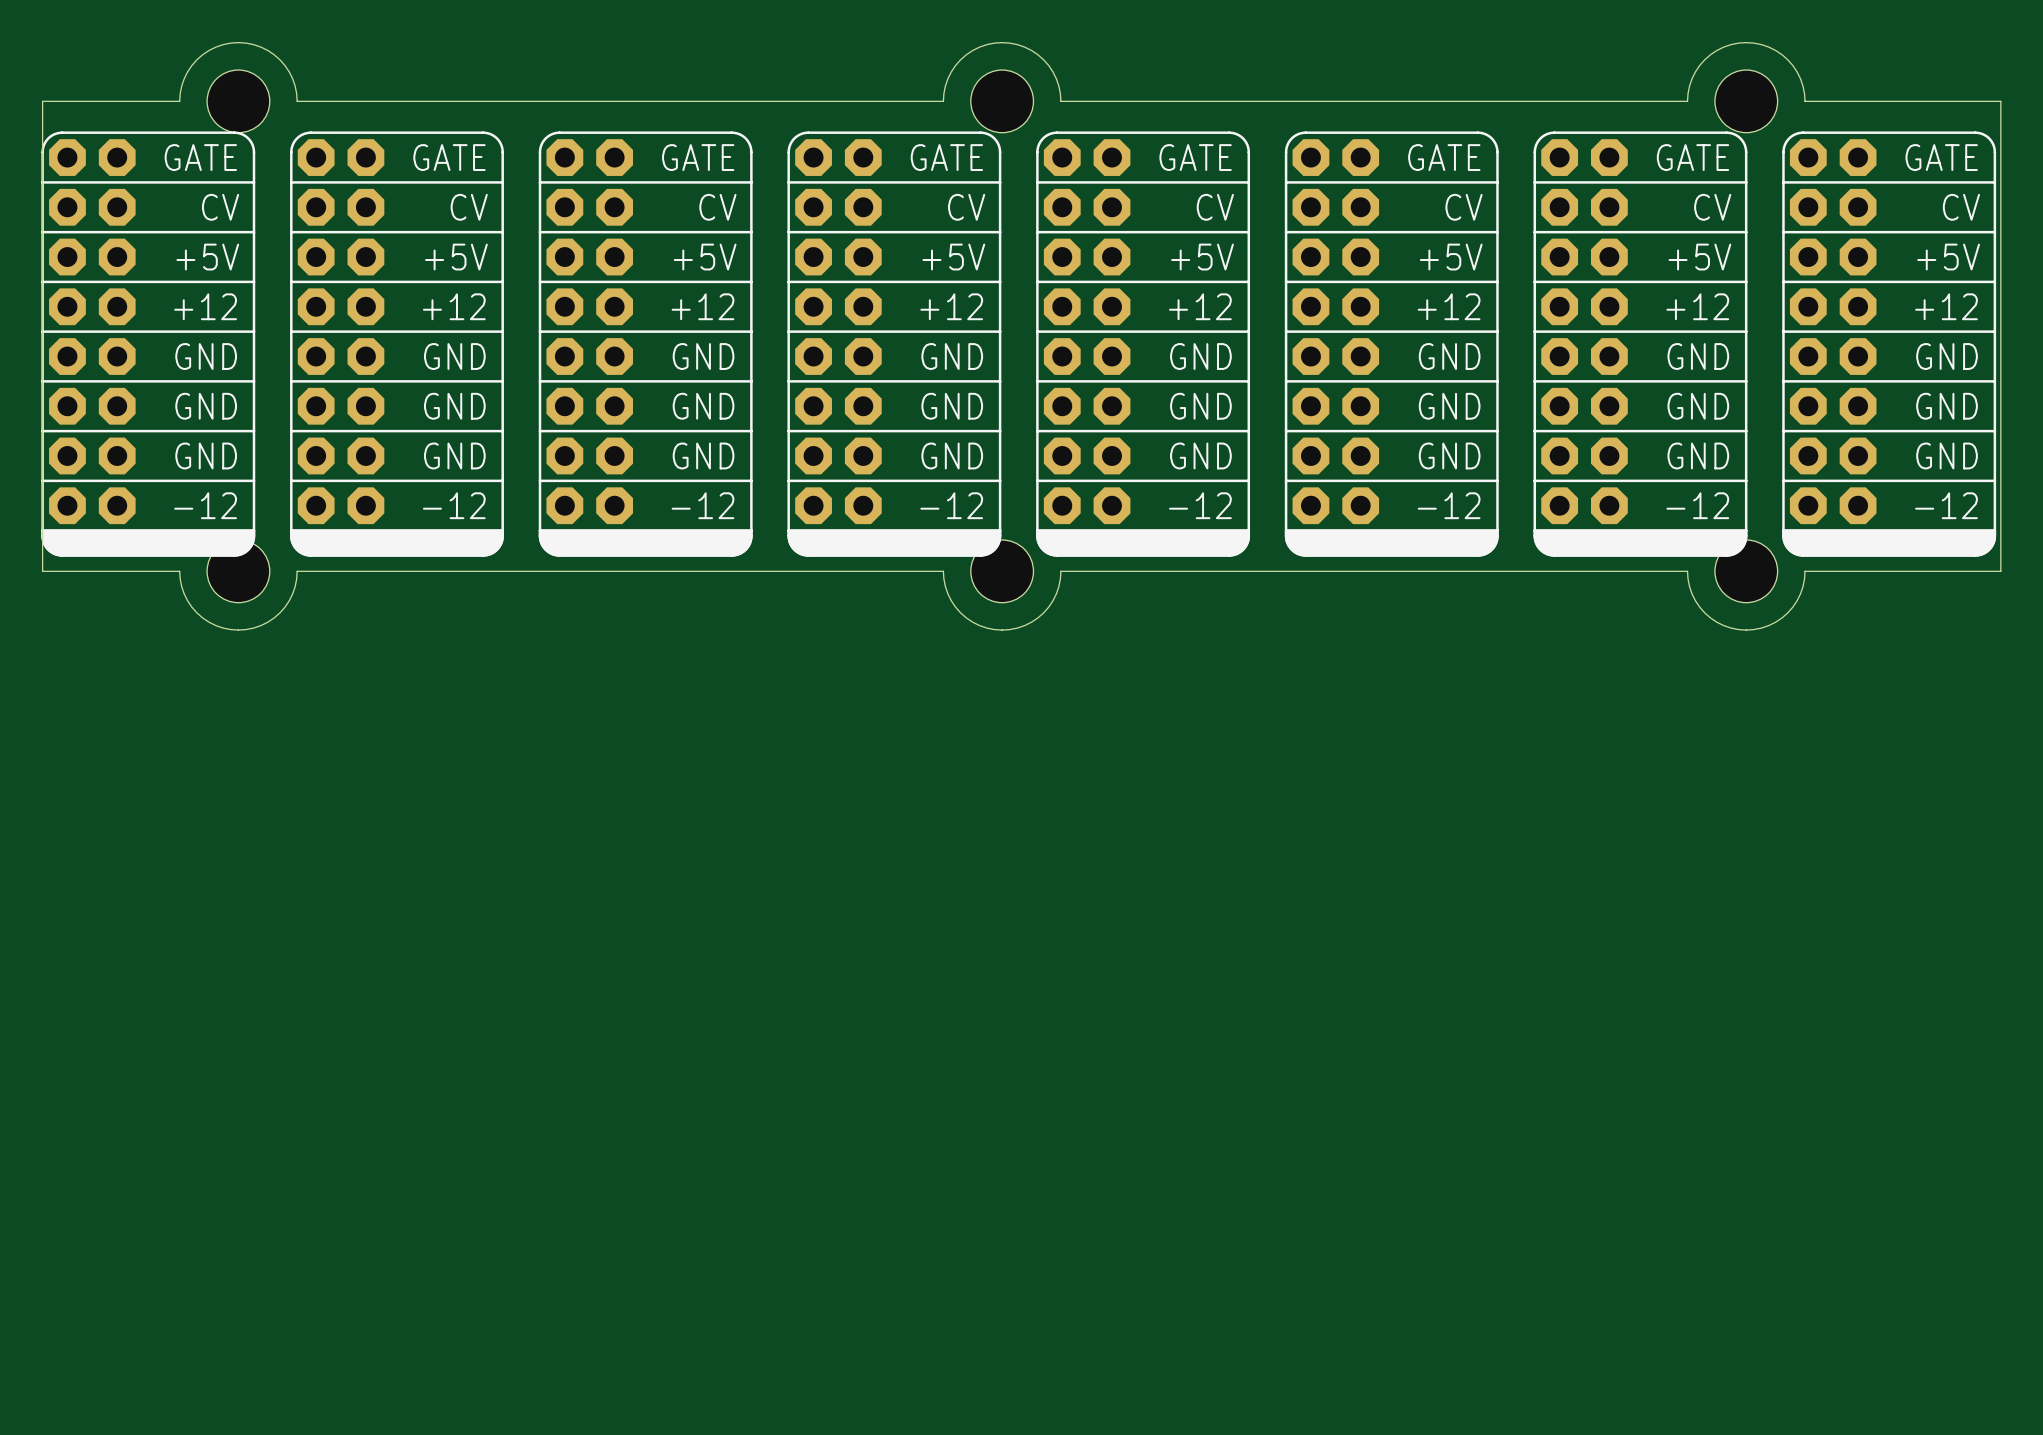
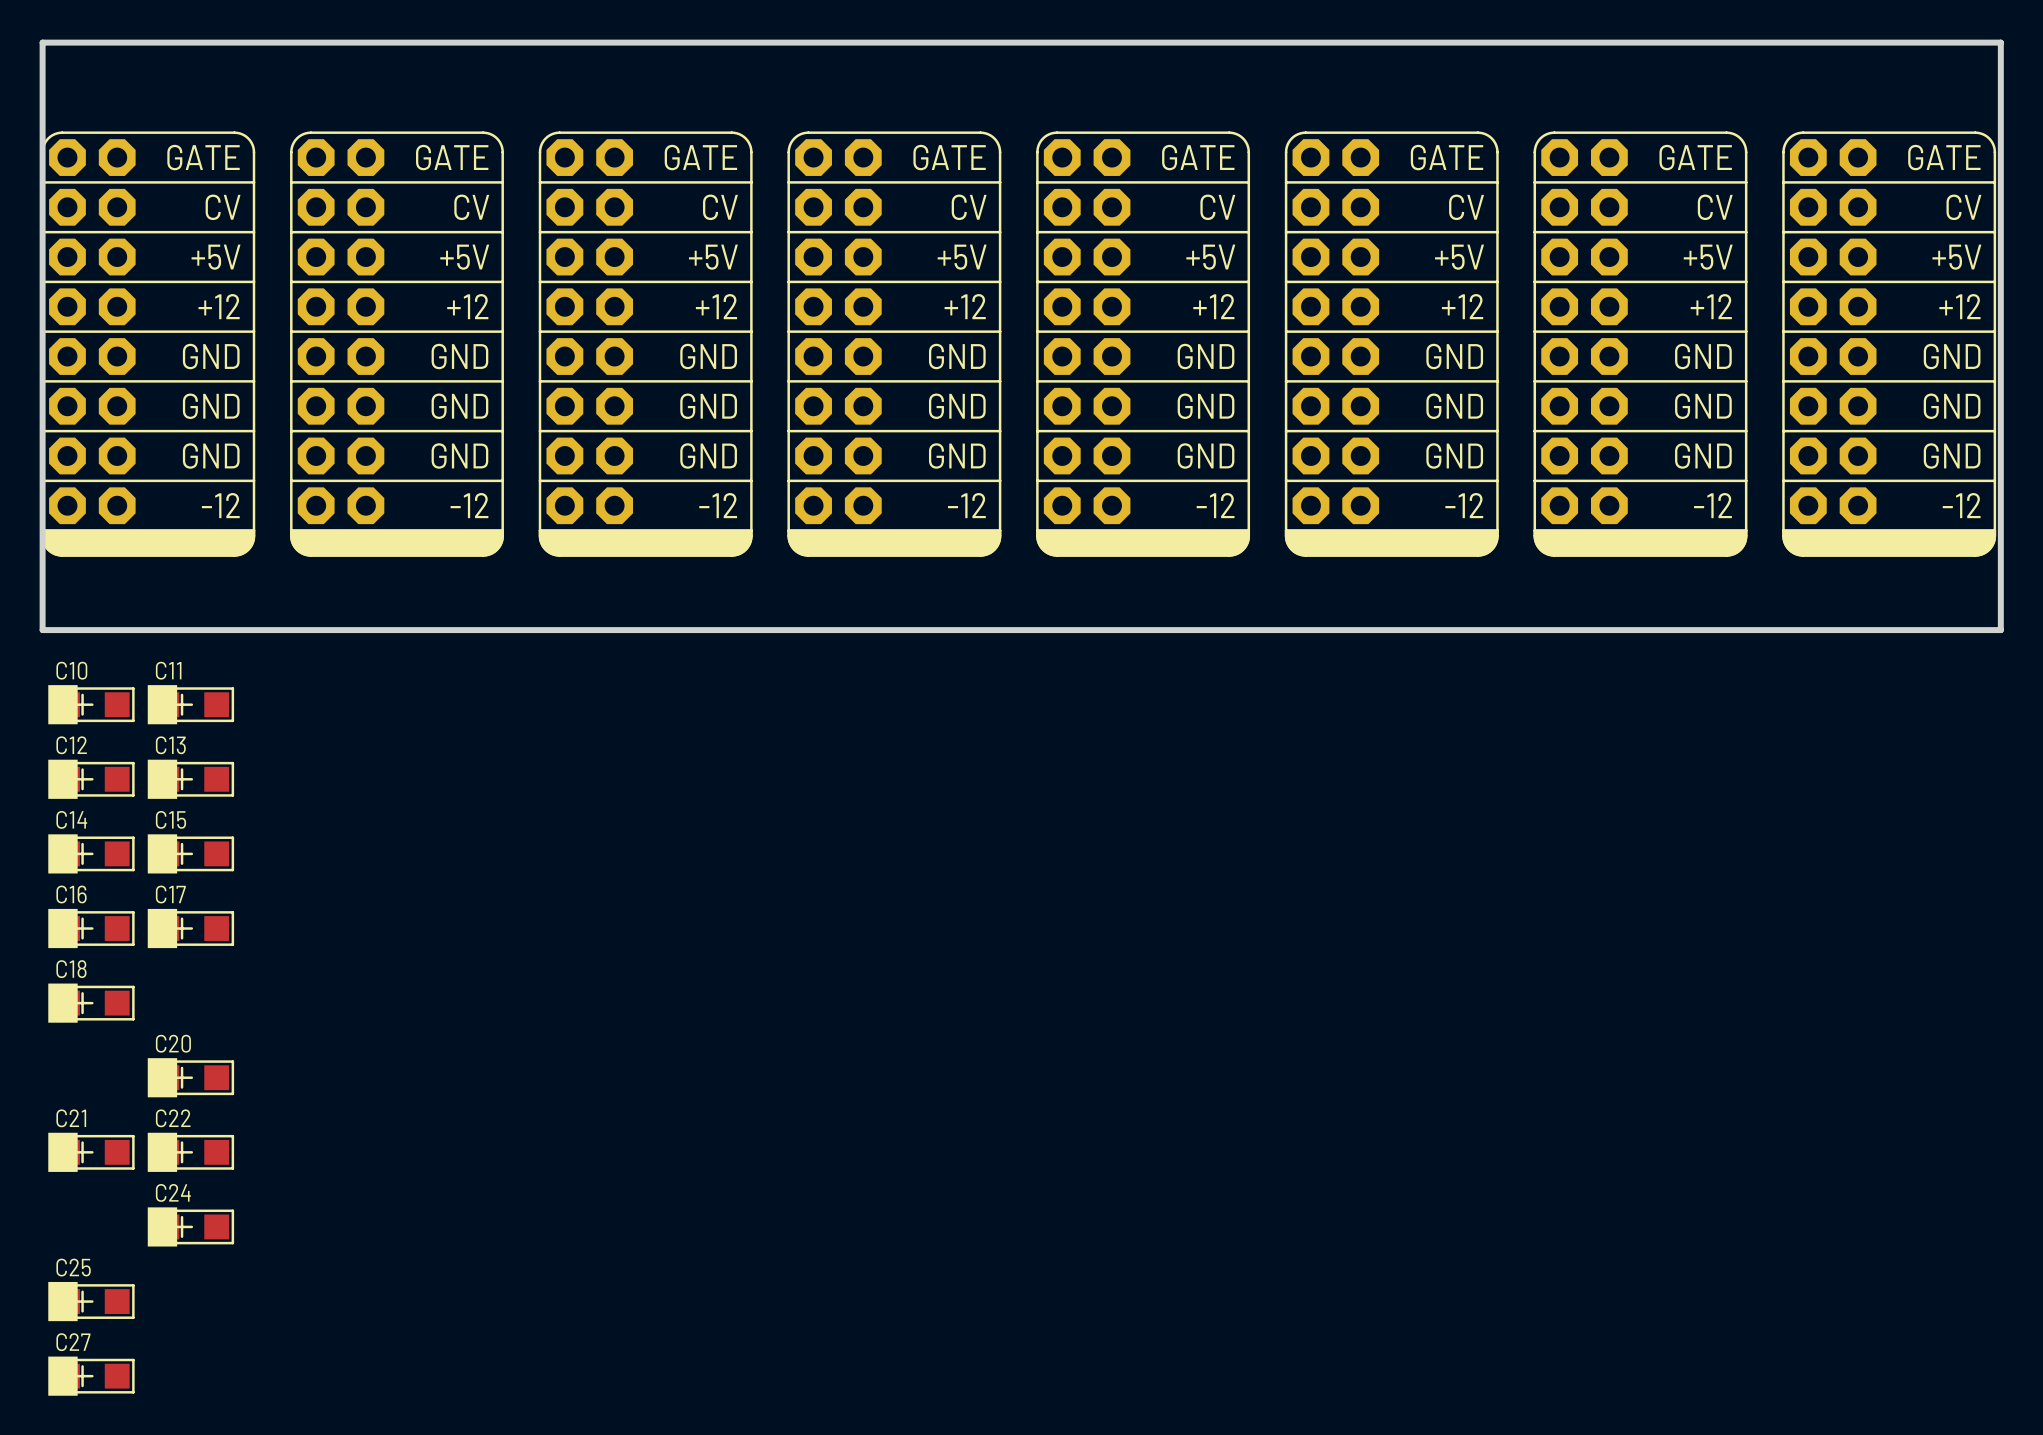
board edge: (42, 101) (179, 101) (184, 78) (196, 59) (215, 47) (238, 42) (260, 47) (279, 59) (292, 78) (297, 101) (943, 101) (947, 78) (960, 59) (979, 47) (1002, 42) (1024, 47) (1043, 59) (1056, 78) (1060, 101) (1687, 101) (1692, 78) (1704, 59) (1723, 47) (1746, 42) (1768, 47) (1787, 59) (1800, 78) (1805, 101) (2000, 101) -> (42, 101) (42, 42) (2000, 42) (2000, 101)
board edge width: thin (42, 101) (42, 571) -> thick (42, 101) (42, 571)
part: (238, 101) -> none
part: (1002, 101) -> none
part: (1746, 101) -> none
board edge width: thin (2000, 101) (2000, 571) -> thick (2000, 101) (2000, 571)
board edge: (42, 571) (179, 571) (184, 593) (196, 612) (215, 625) (238, 630) (260, 625) (279, 612) (292, 593) (297, 571) (943, 571) (947, 593) (960, 612) (979, 625) (1002, 630) (1024, 625) (1043, 612) (1056, 593) (1060, 571) (1687, 571) (1692, 593) (1704, 612) (1723, 625) (1746, 630) (1768, 625) (1787, 612) (1800, 593) (1805, 571) (2000, 571) -> (42, 571) (42, 630) (2000, 630) (2000, 571)
part: (238, 571) -> none
part: (1002, 571) -> none
part: (1746, 571) -> none
C10: none -> (91, 704)
C11: none -> (190, 704)
C12: none -> (91, 779)
C13: none -> (190, 779)
C14: none -> (91, 853)
C15: none -> (190, 853)
C16: none -> (91, 928)
C17: none -> (190, 928)
C18: none -> (91, 1003)
C20: none -> (190, 1077)
C21: none -> (91, 1152)
C22: none -> (190, 1152)
C24: none -> (190, 1226)
C25: none -> (91, 1301)
C27: none -> (91, 1376)

